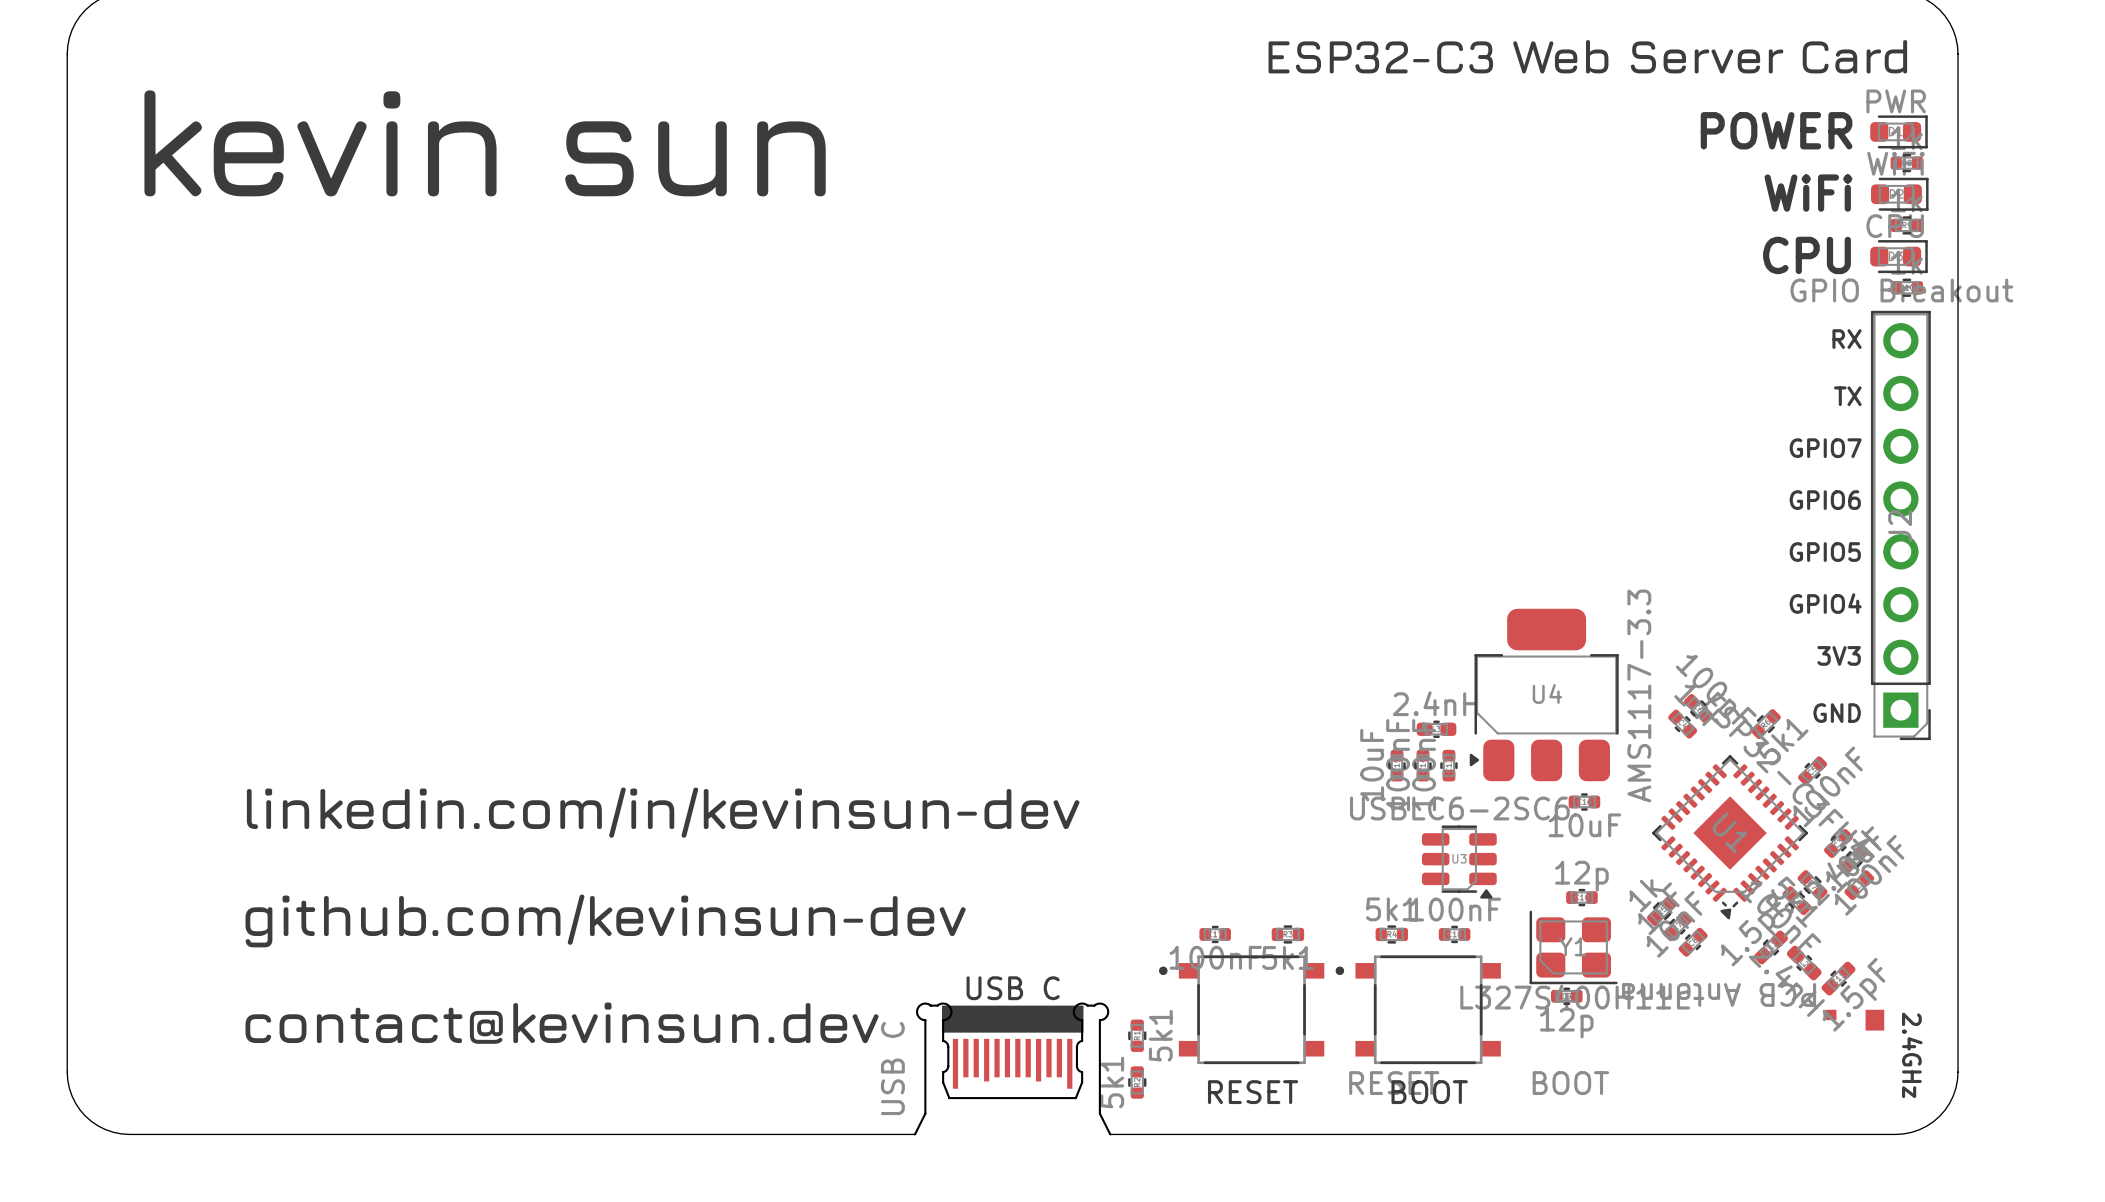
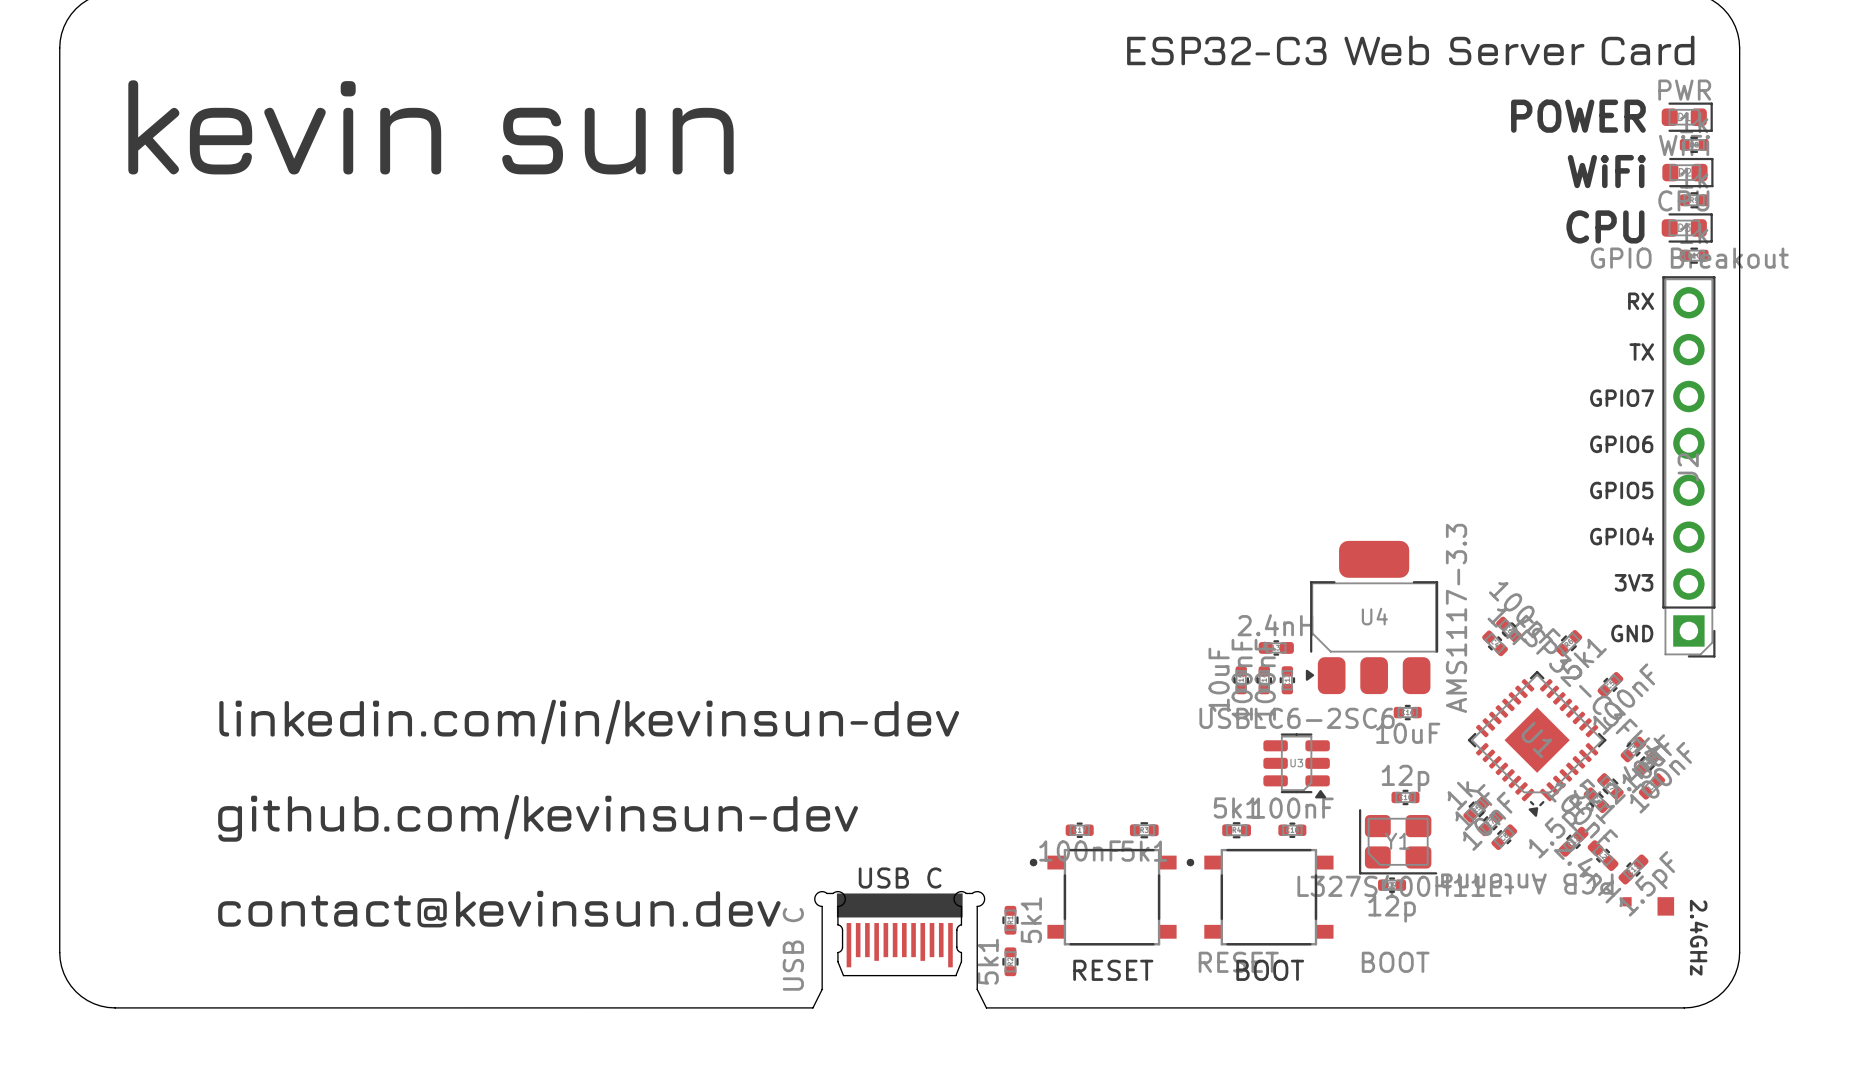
board edge: none -> (837, 924) (837, 906) (844, 902) (844, 895) (838, 891) (833, 893) (818, 892) (814, 899) (817, 904) (822, 906) (822, 989) (812, 1007)
board edge: none -> (837, 924) (842, 929) (842, 947) (837, 952) (837, 961) (843, 975) (955, 975) (961, 961) (961, 952)
board edge: none -> (961, 924) (961, 906) (955, 902) (955, 894) (961, 891) (966, 893) (981, 892) (984, 899) (982, 904) (977, 906) (977, 989) (986, 1007)
board edge: none -> (961, 924) (956, 930) (957, 948) (961, 952)
USB C: none -> USB C (899, 930)
USB C: USB C (1012, 1069) -> none

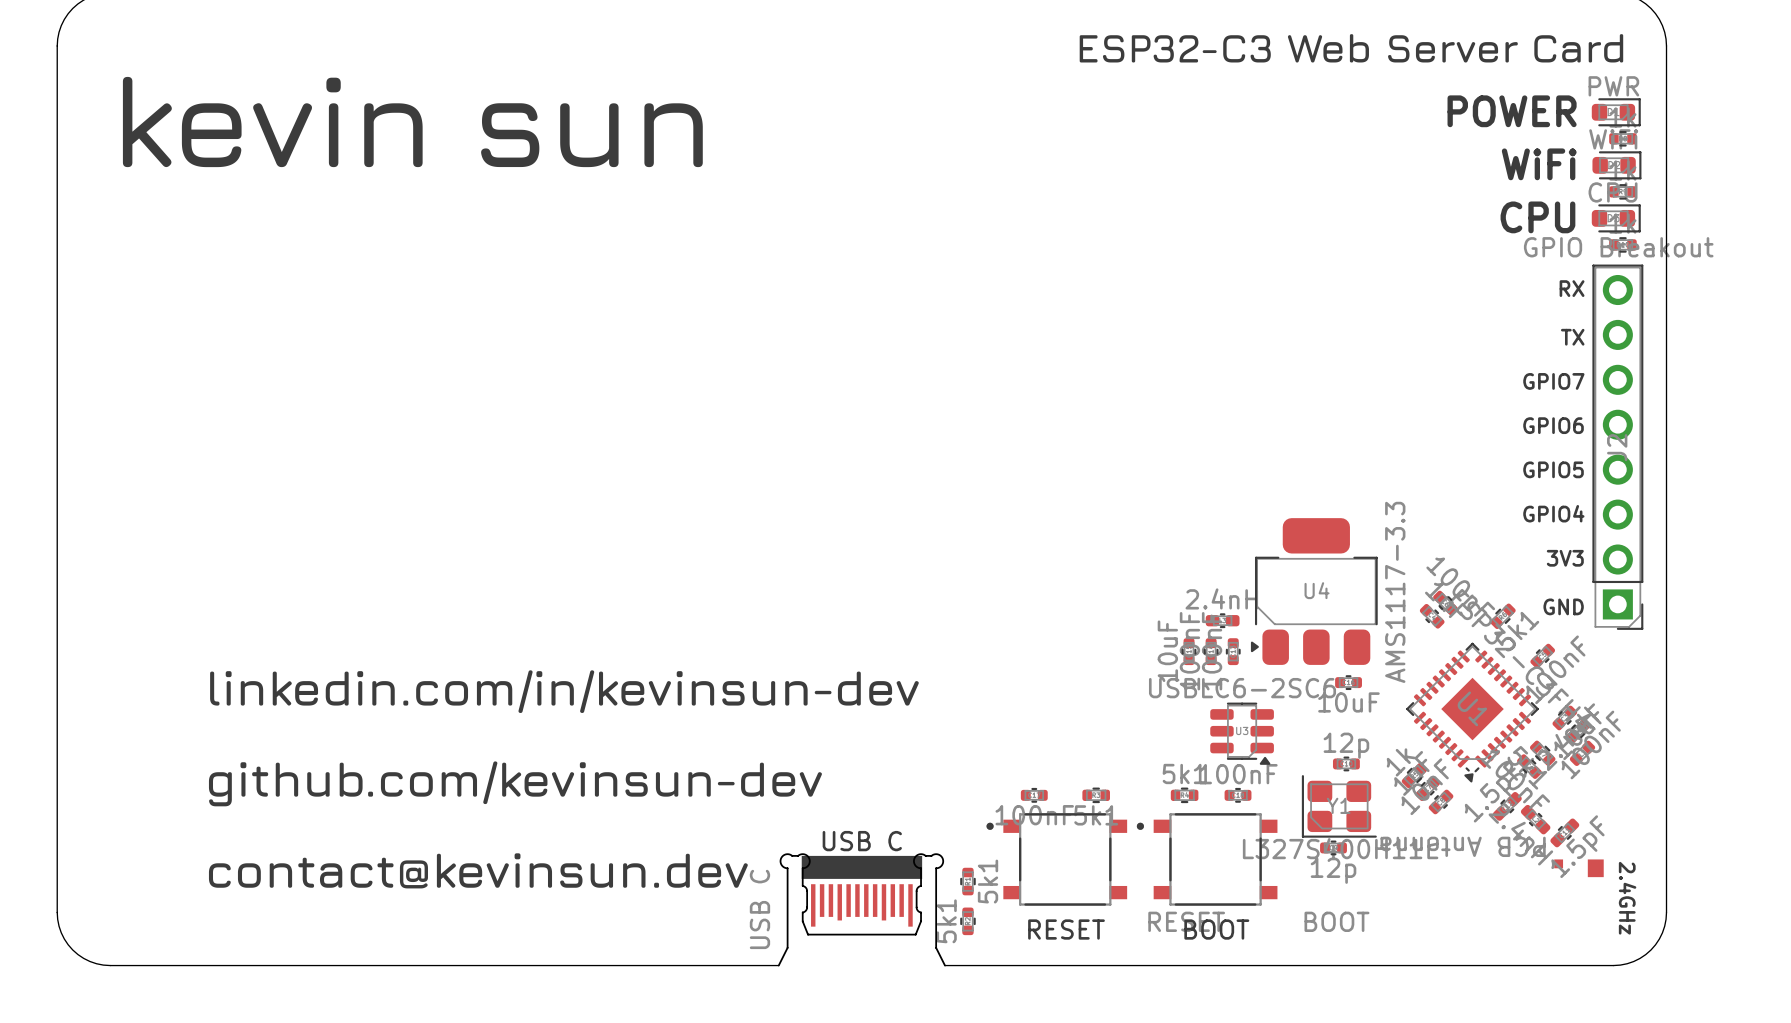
board edge: (837, 924) (837, 906) (844, 902) (844, 895) (838, 891) (833, 893) (818, 892) (814, 899) (817, 904) (822, 906) (822, 989) (812, 1007) -> none
board edge: (837, 924) (842, 929) (842, 947) (837, 952) (837, 961) (843, 975) (955, 975) (961, 961) (961, 952) -> none
board edge: (961, 924) (961, 906) (955, 902) (955, 894) (961, 891) (966, 893) (981, 892) (984, 899) (982, 904) (977, 906) (977, 989) (986, 1007) -> none
board edge: (961, 924) (956, 930) (957, 948) (961, 952) -> none
USB C: USB C (899, 930) -> none
USB C: none -> USB C (861, 909)

